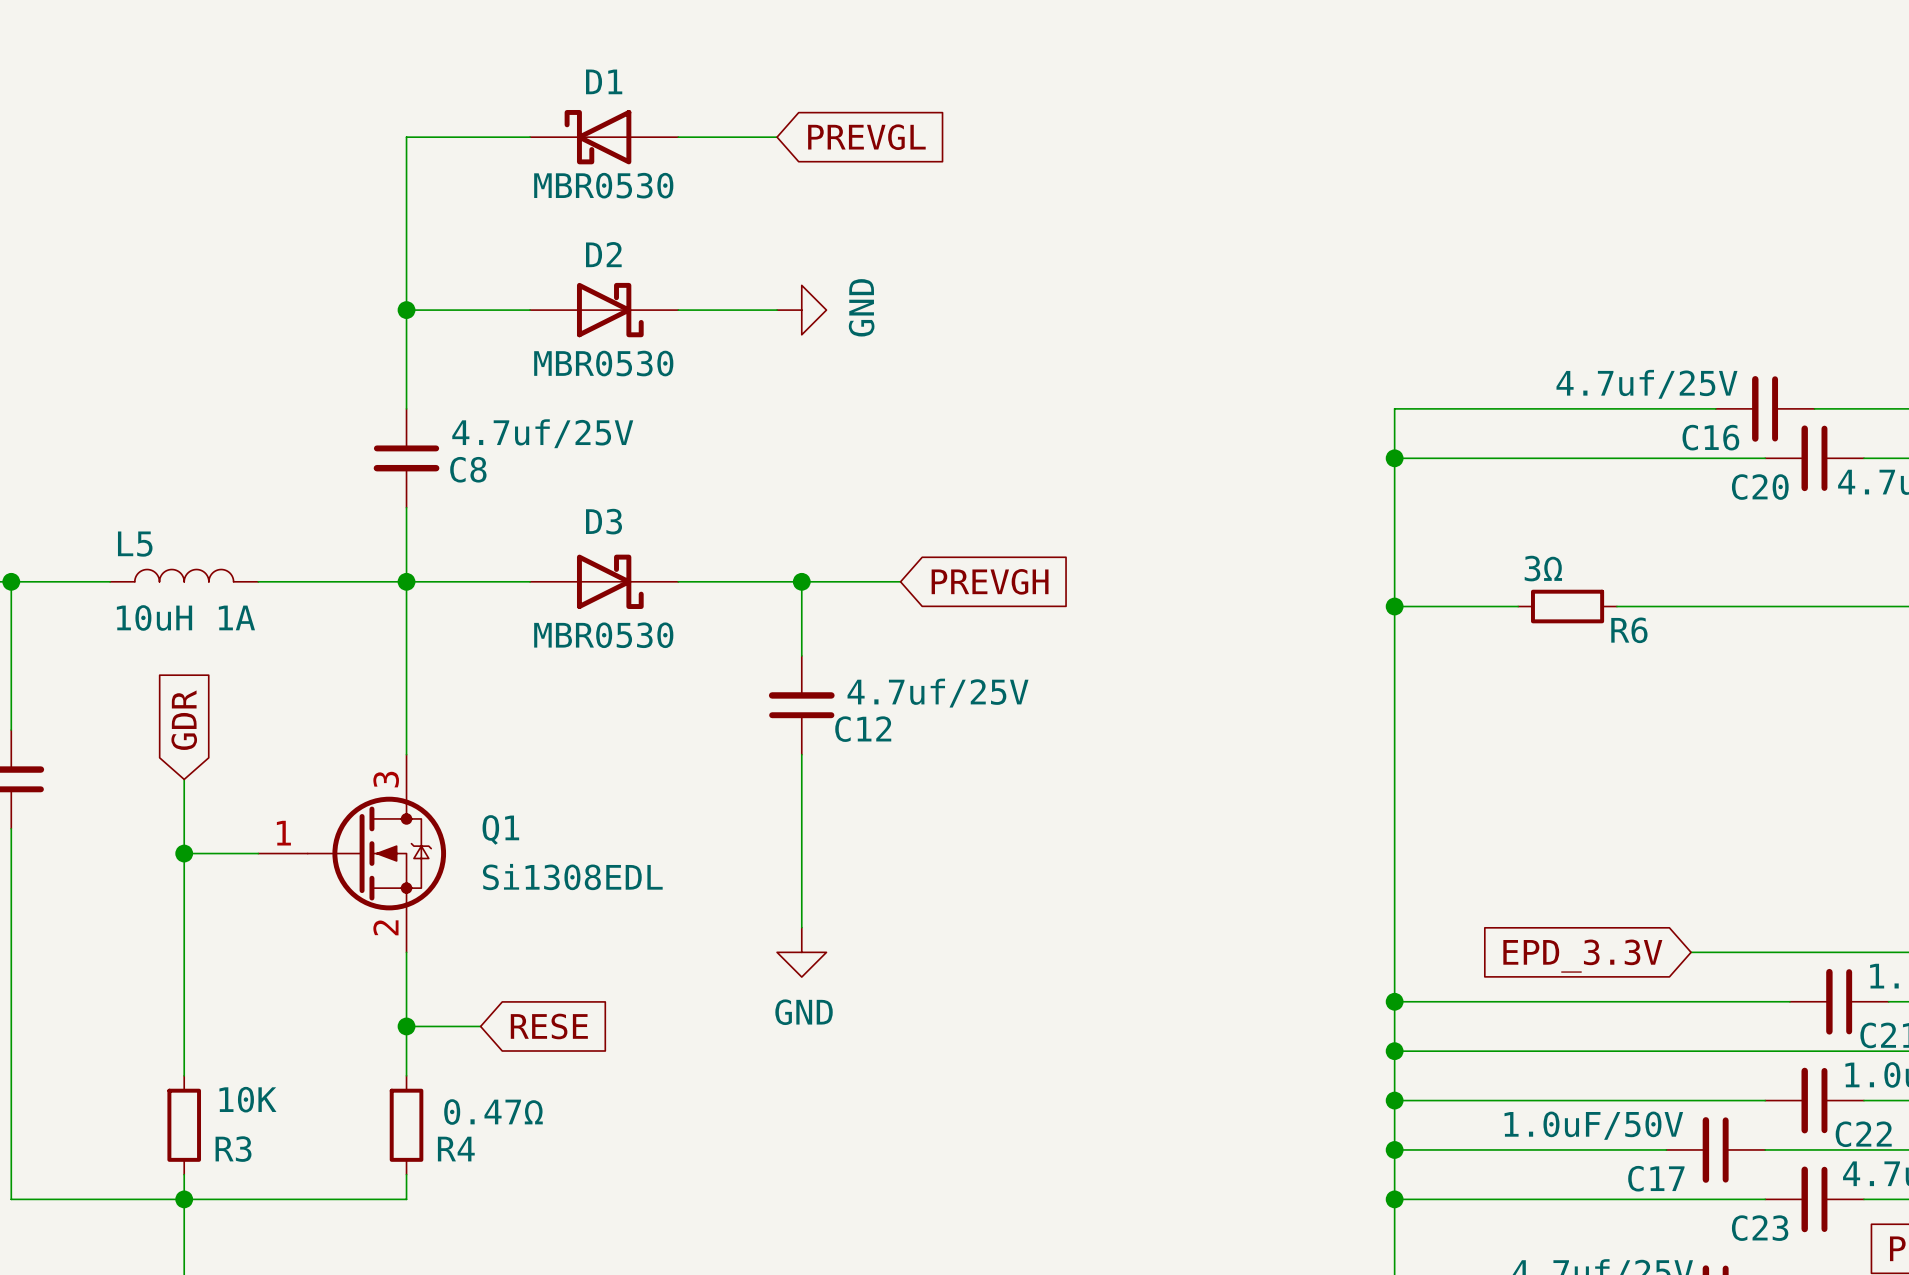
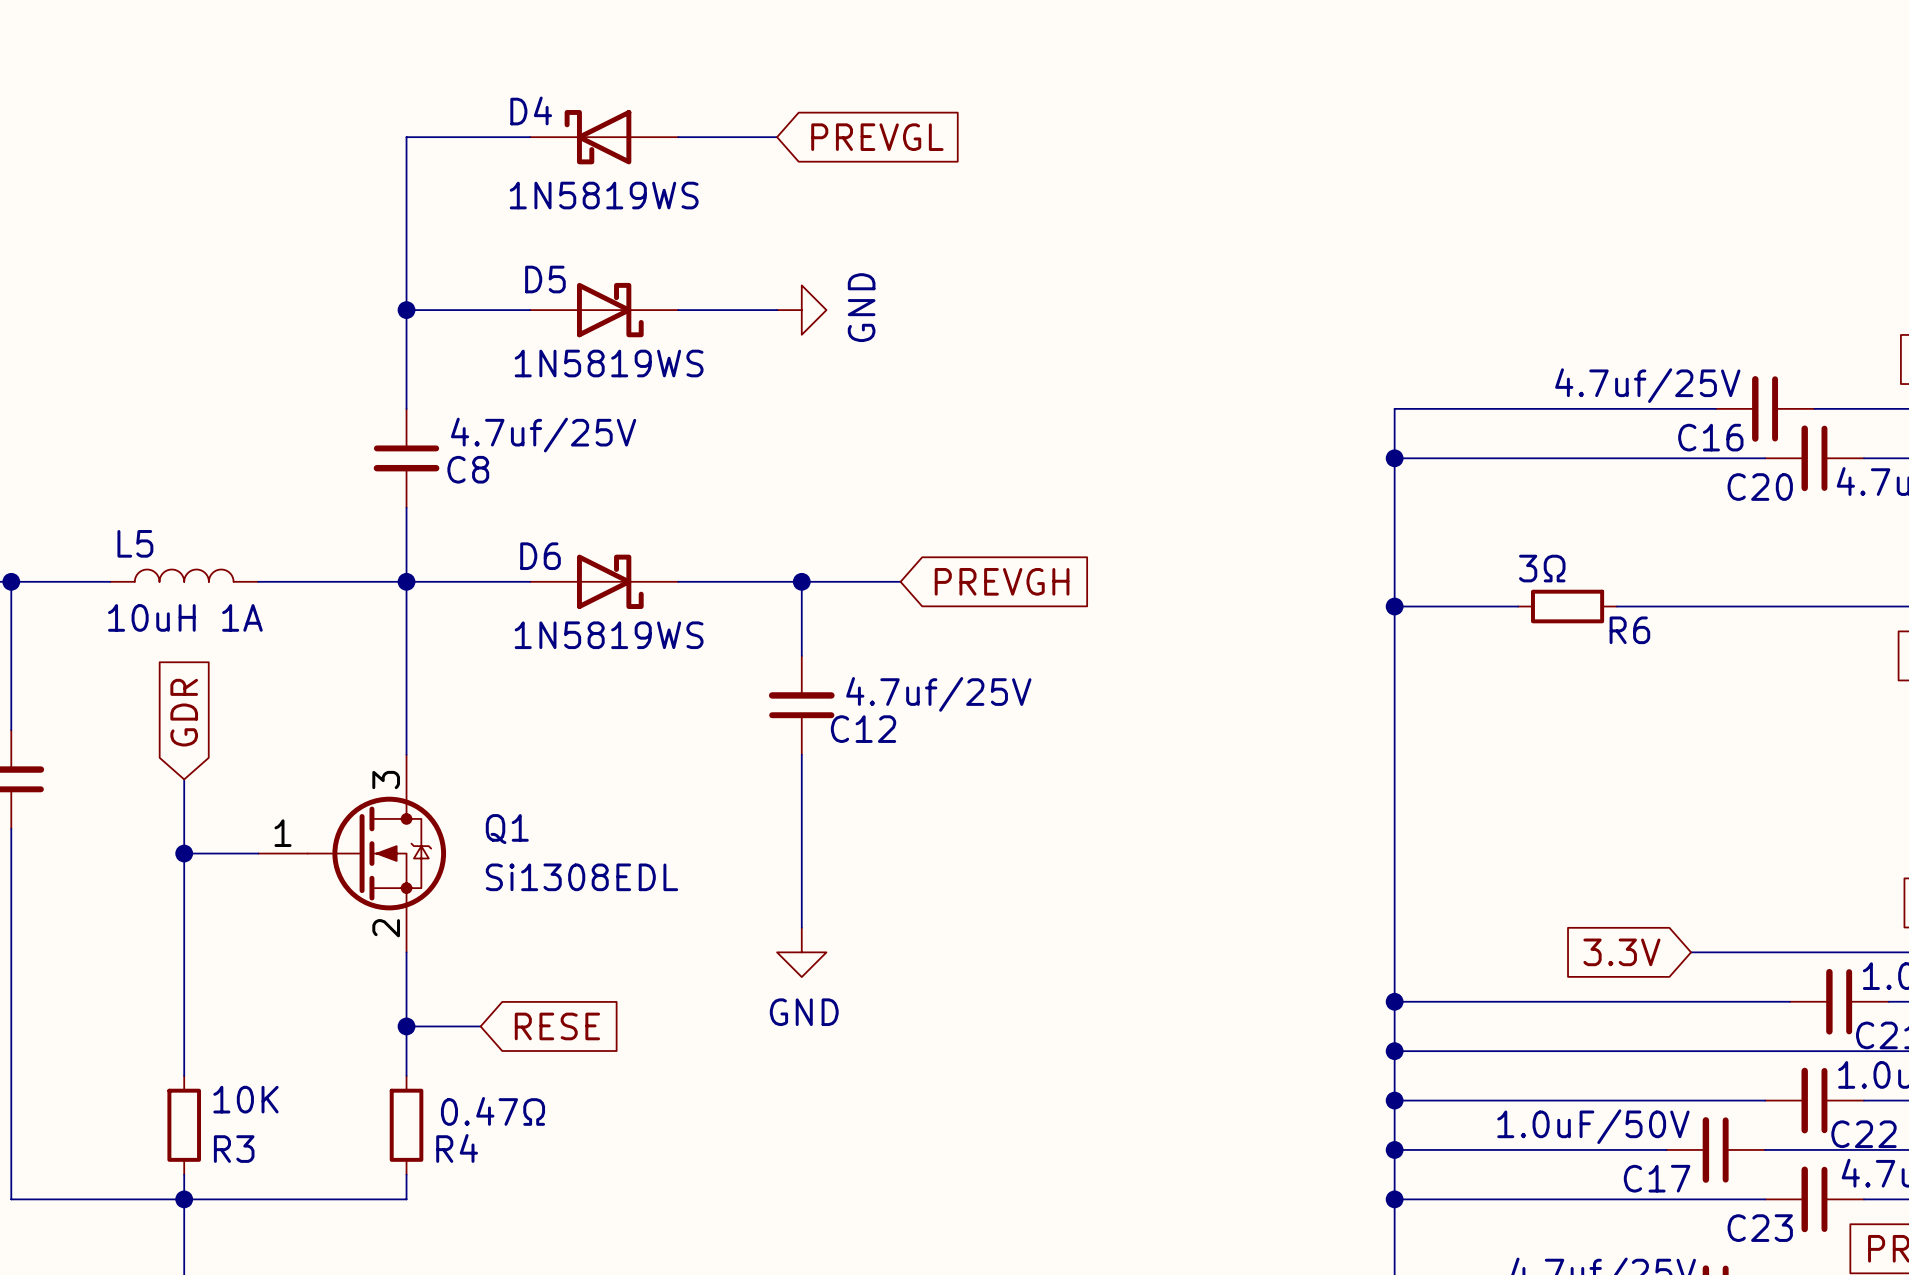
D1 name: D1 (604, 81) -> D4 (531, 110)
D1 value: MBR0530 (603, 185) -> 1N5819WS (604, 195)
D2 name: D2 (603, 254) -> D5 (545, 279)
D2 value: MBR0530 (603, 363) -> 1N5819WS (609, 363)
D3 name: D3 (604, 521) -> D6 (540, 556)
D3 value: MBR0530 (603, 635) -> 1N5819WS (609, 635)
global label: EPD_3.3V (1582, 956) -> 3.3V (1621, 952)

